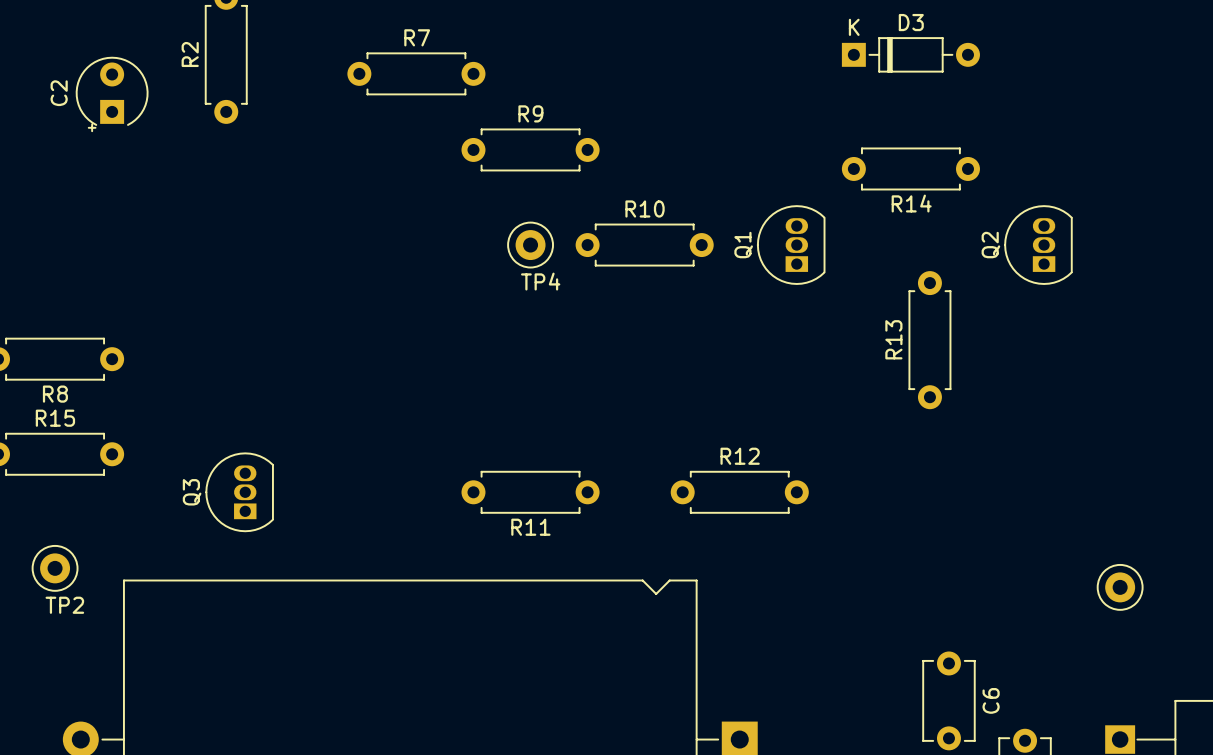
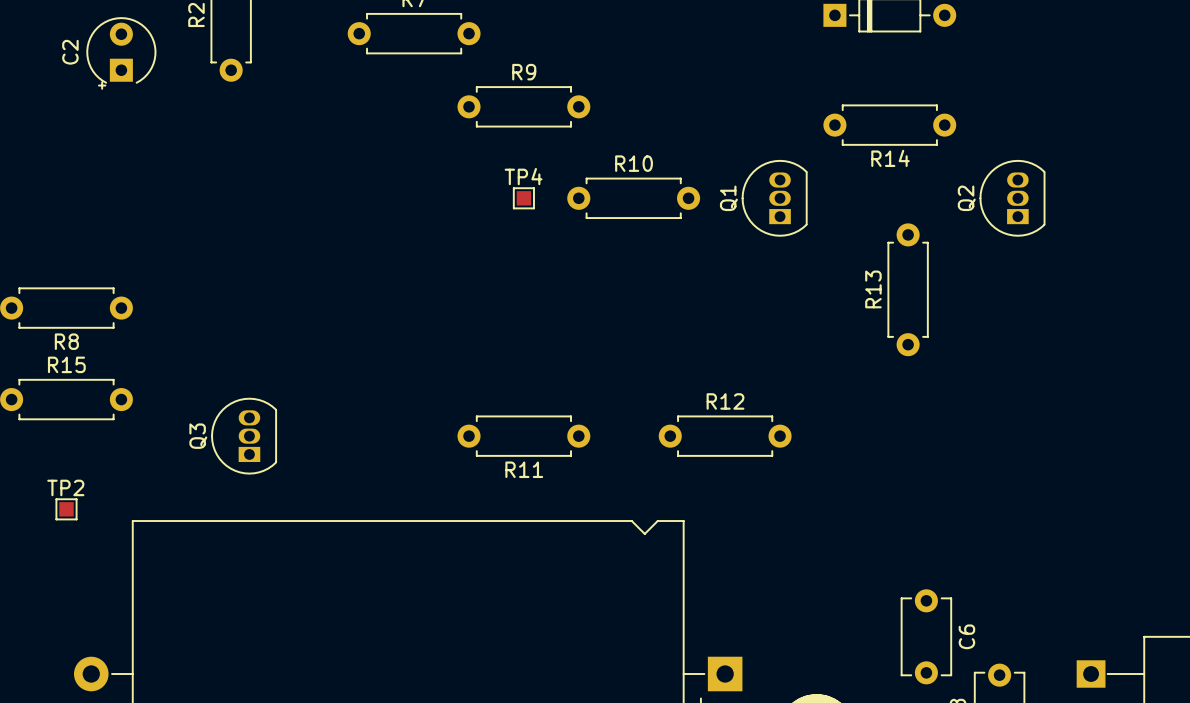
TP4 footprint: [507, 221, 554, 269] -> [512, 187, 535, 210]
TP4 name position: TP4 (540, 281) -> TP4 (523, 176)
TP2 footprint: [31, 545, 79, 592] -> [55, 498, 78, 521]
part: (1120, 587) -> none
TP2 name position: TP2 (64, 605) -> TP2 (65, 487)

